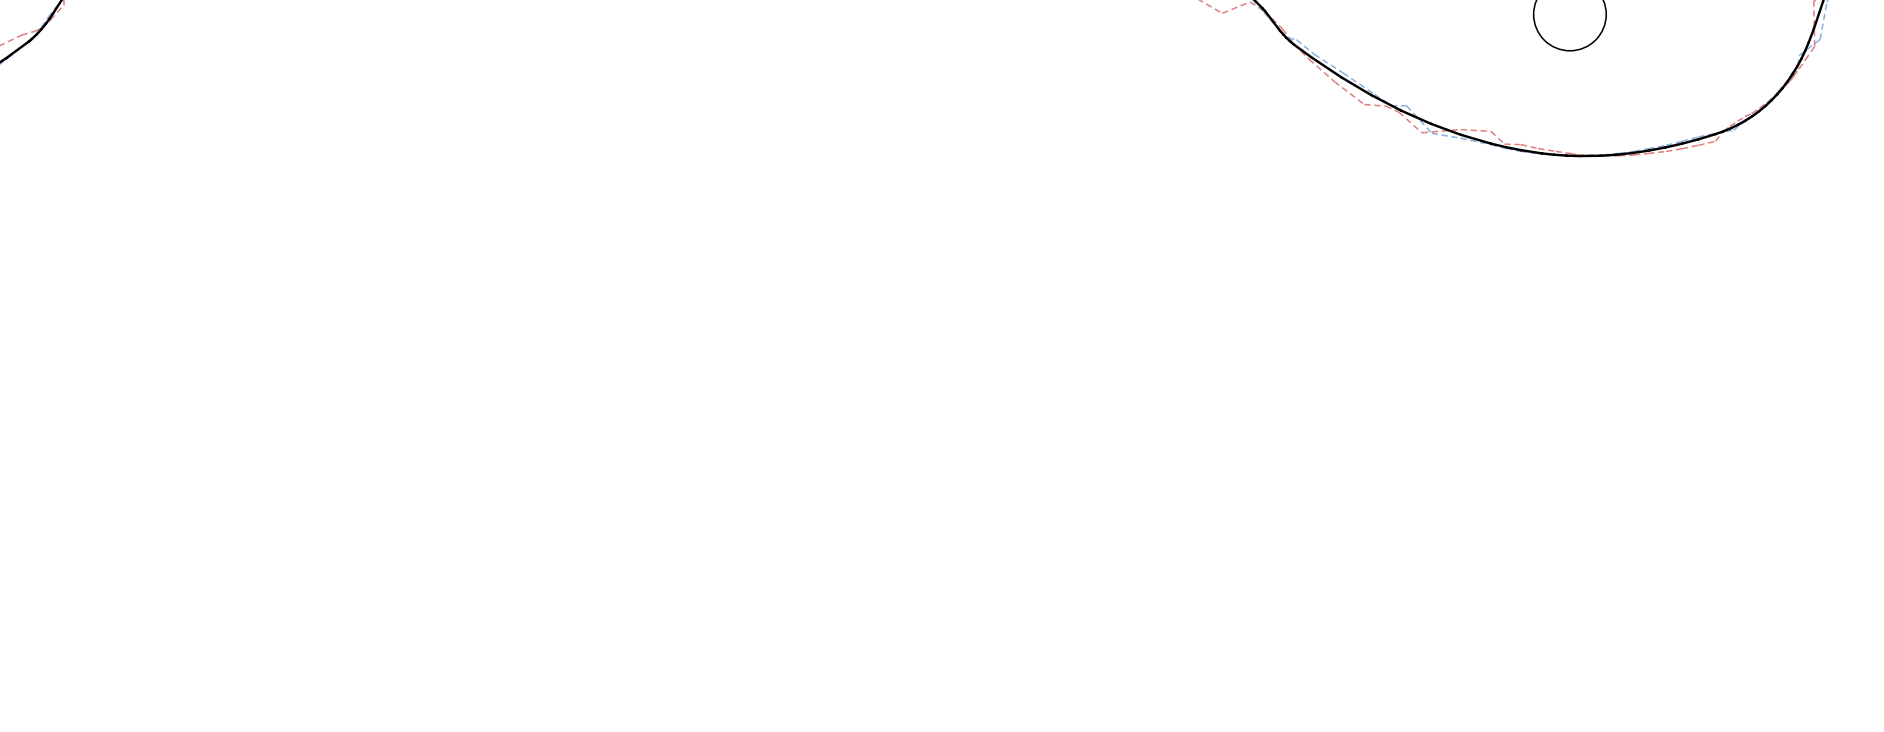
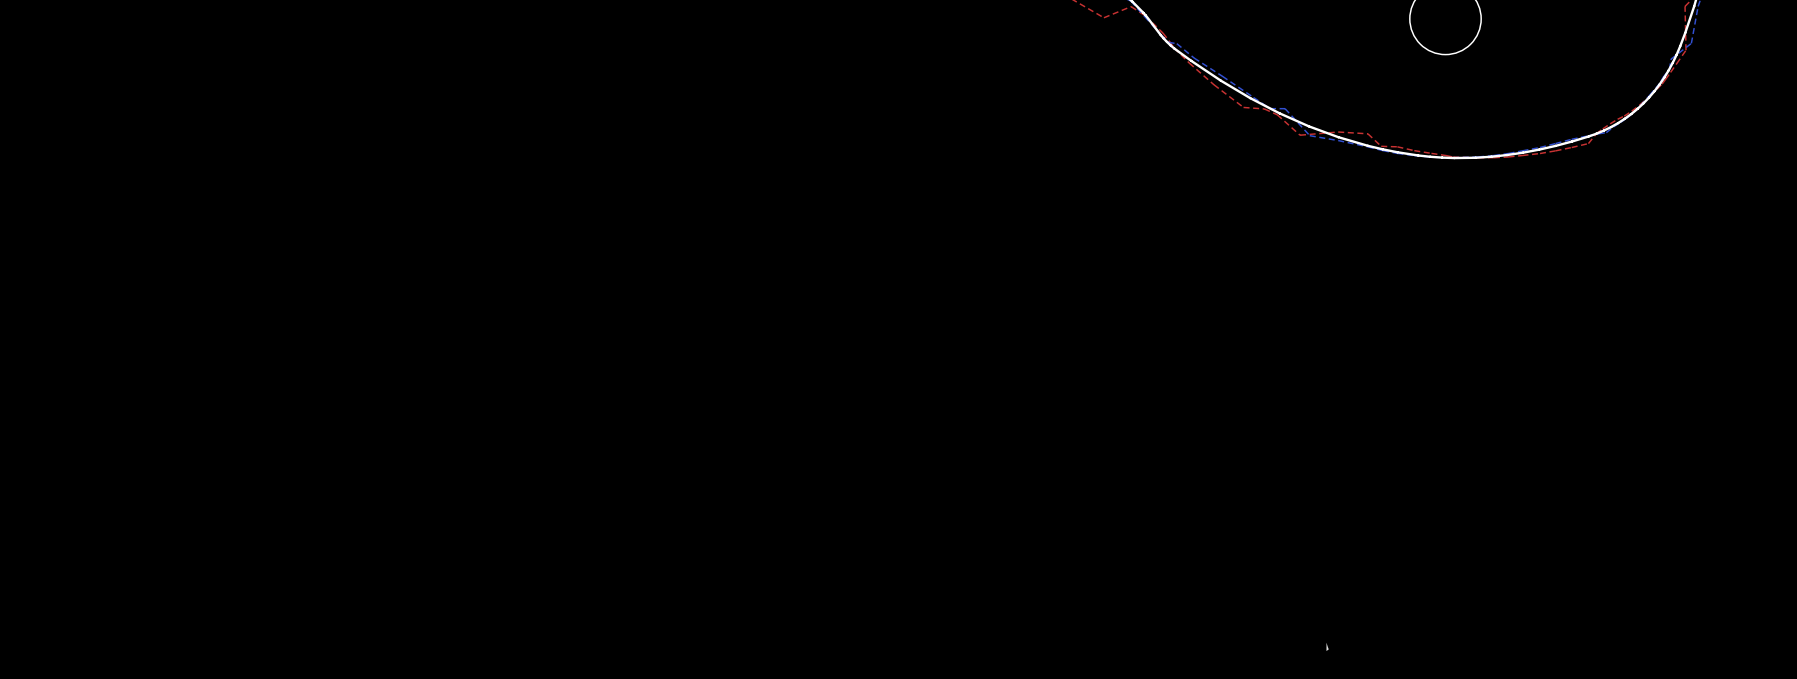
drawing: none -> [1326, 642, 1329, 652]

